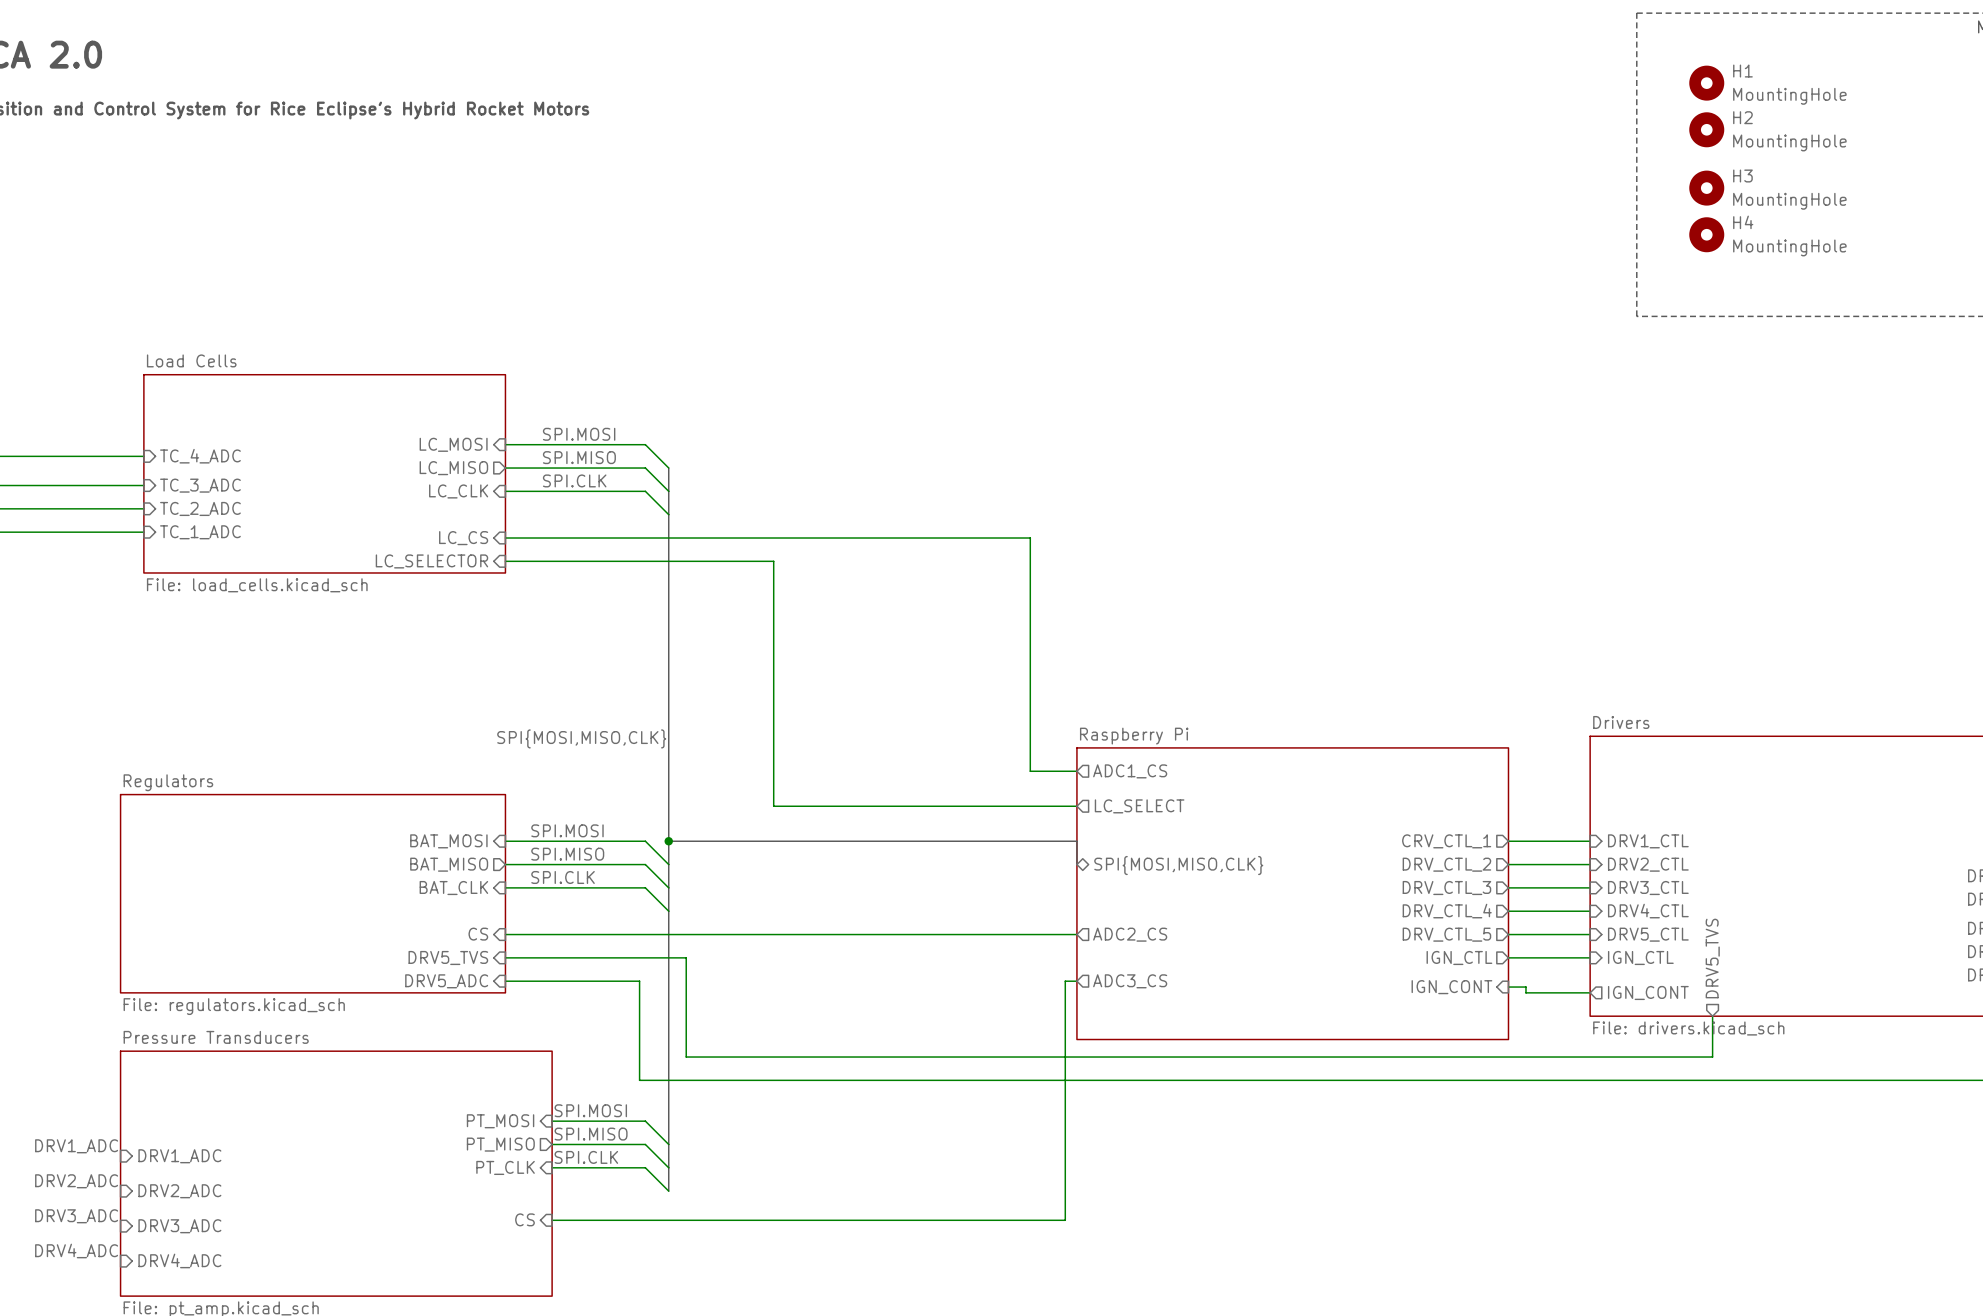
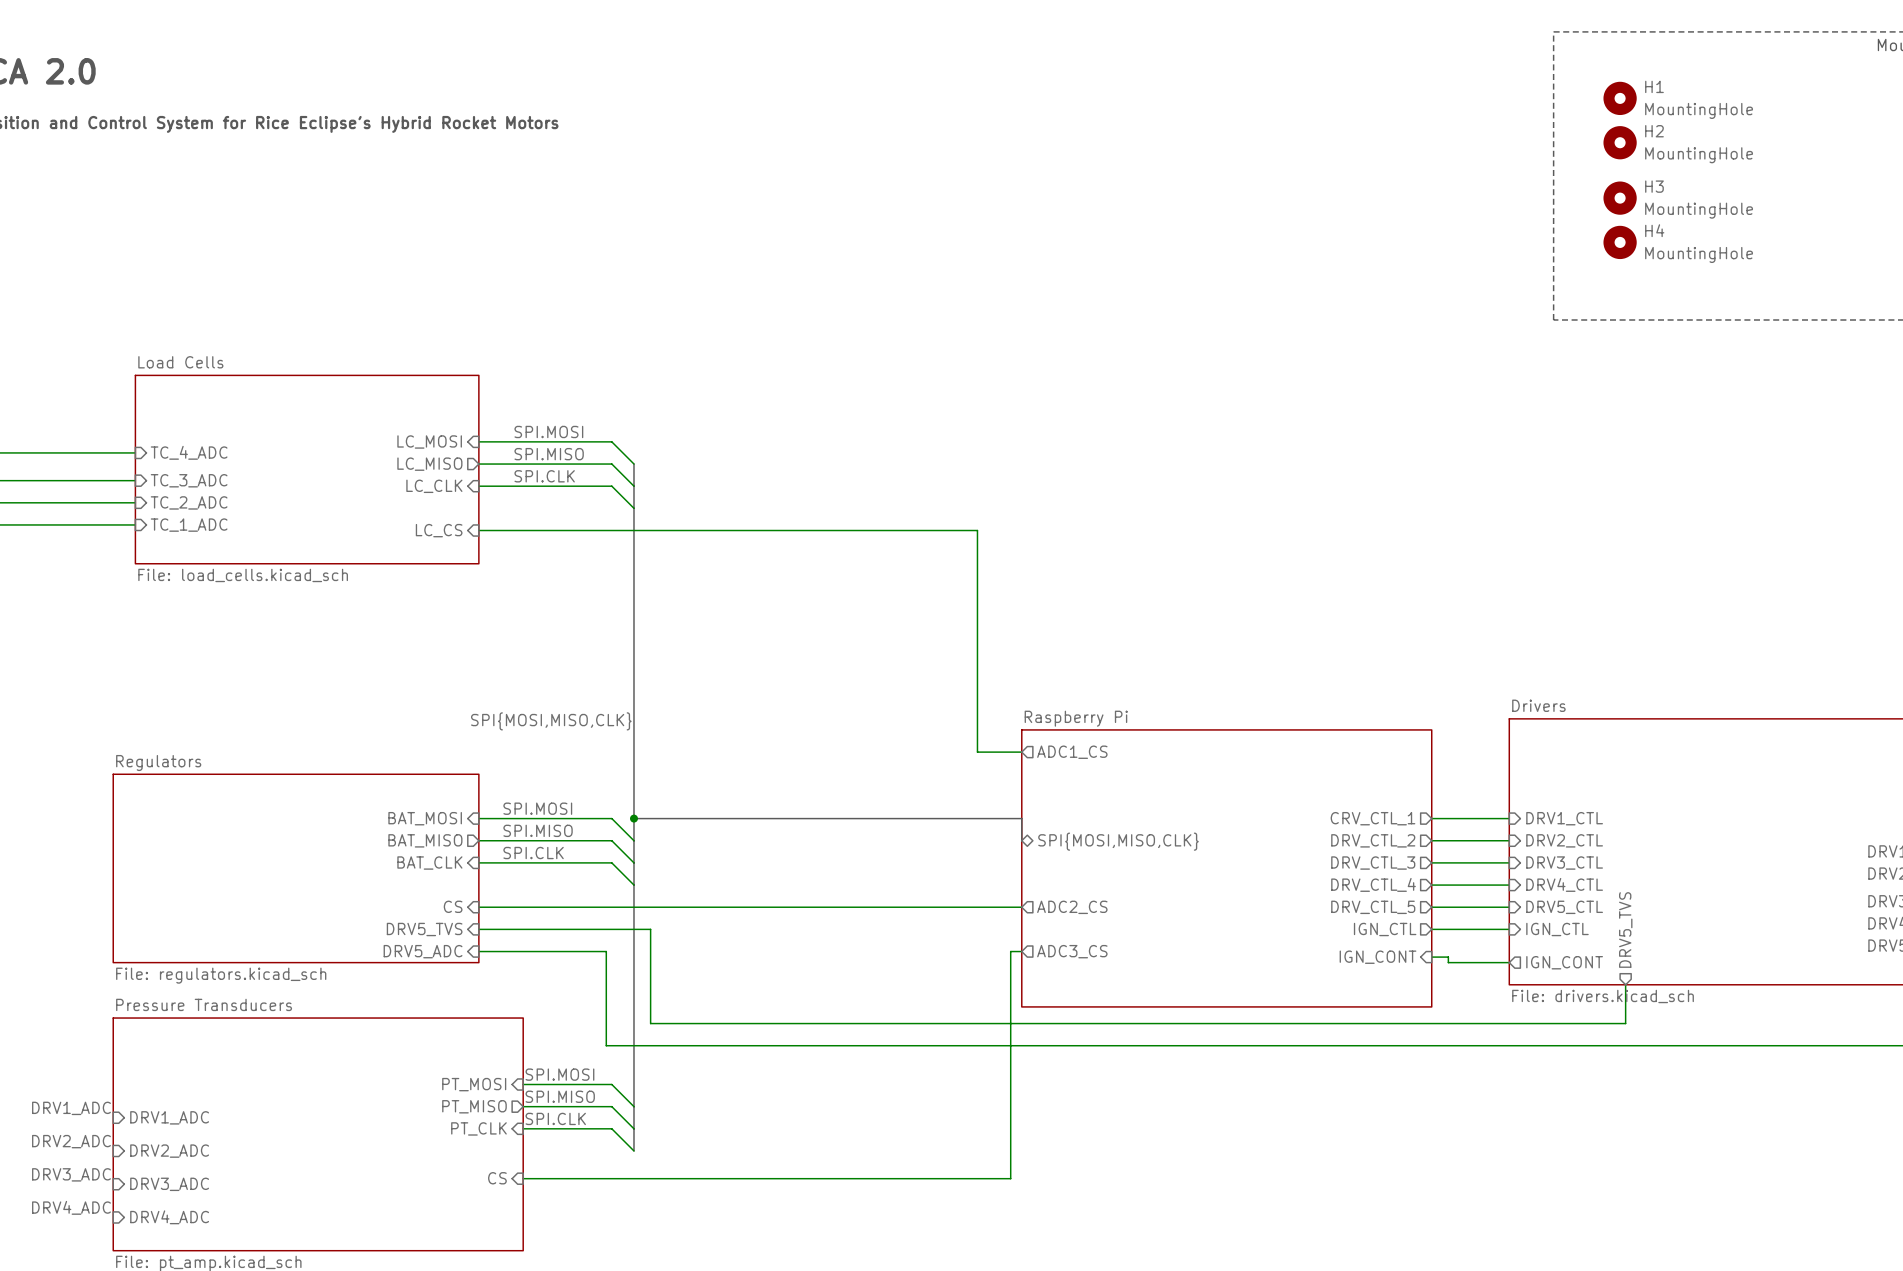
sheet pin: LC_SELECTOR (431, 561) -> none
wire: (505, 561) (773, 561) (773, 806) (1076, 806) -> none
sheet pin: LC_SELECT (1139, 806) -> none

